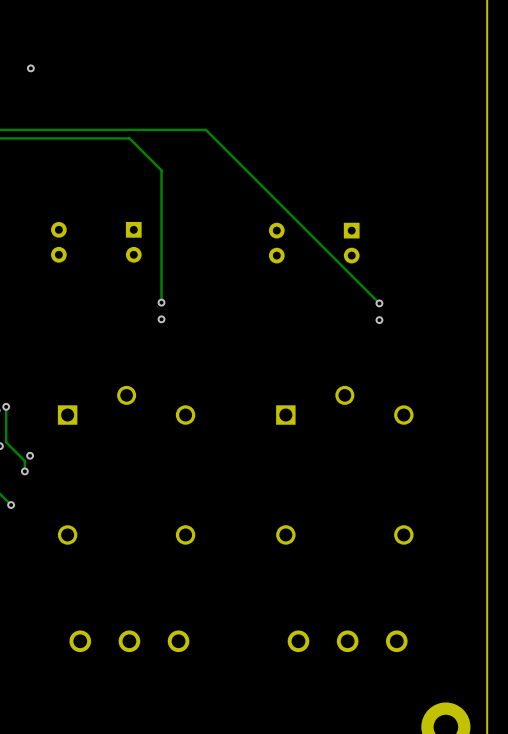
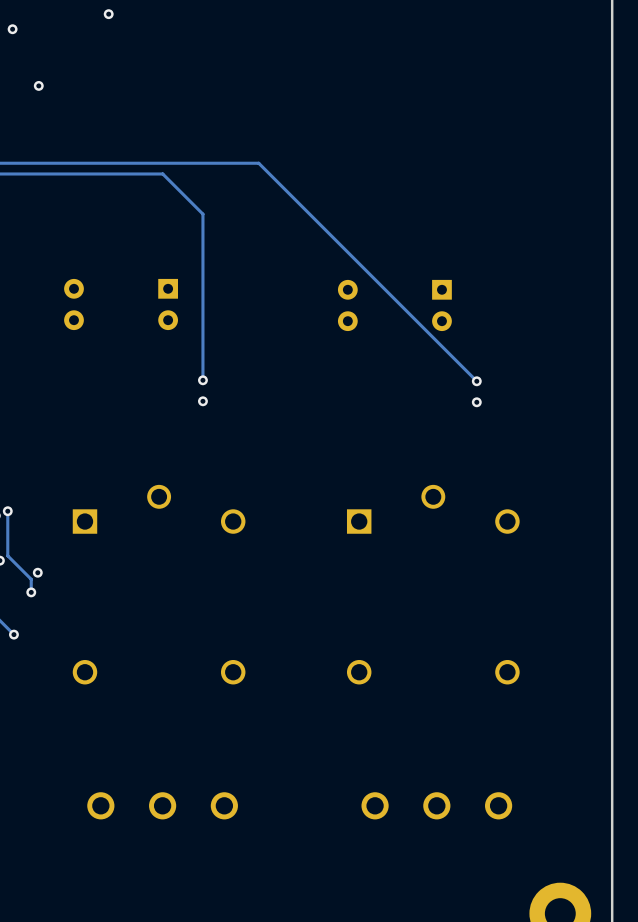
via: none -> (108, 14)
via: none -> (12, 29)

